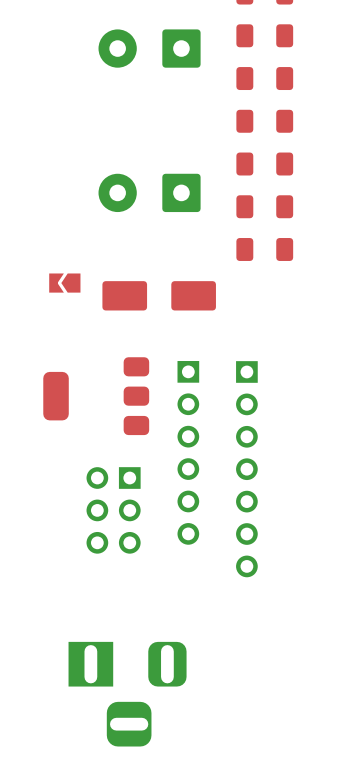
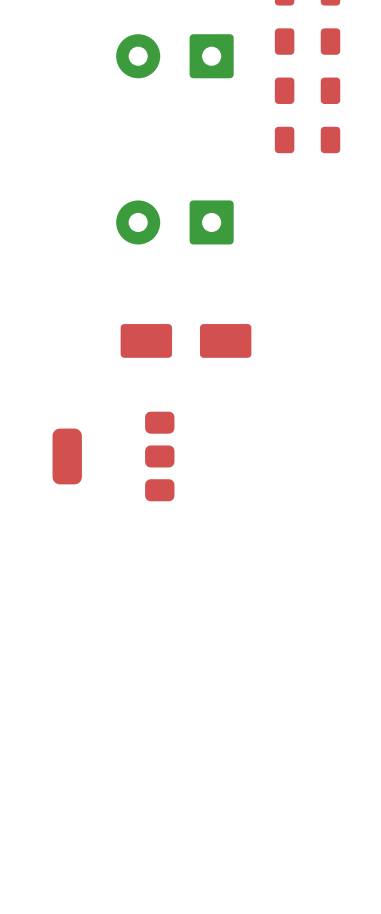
part: (264, 164) -> none
part: (264, 206) -> none
part: (264, 249) -> none
part: (64, 283) -> none
part: (188, 452) -> none
part: (246, 469) -> none
part: (113, 510) -> none
part: (127, 694) -> none

